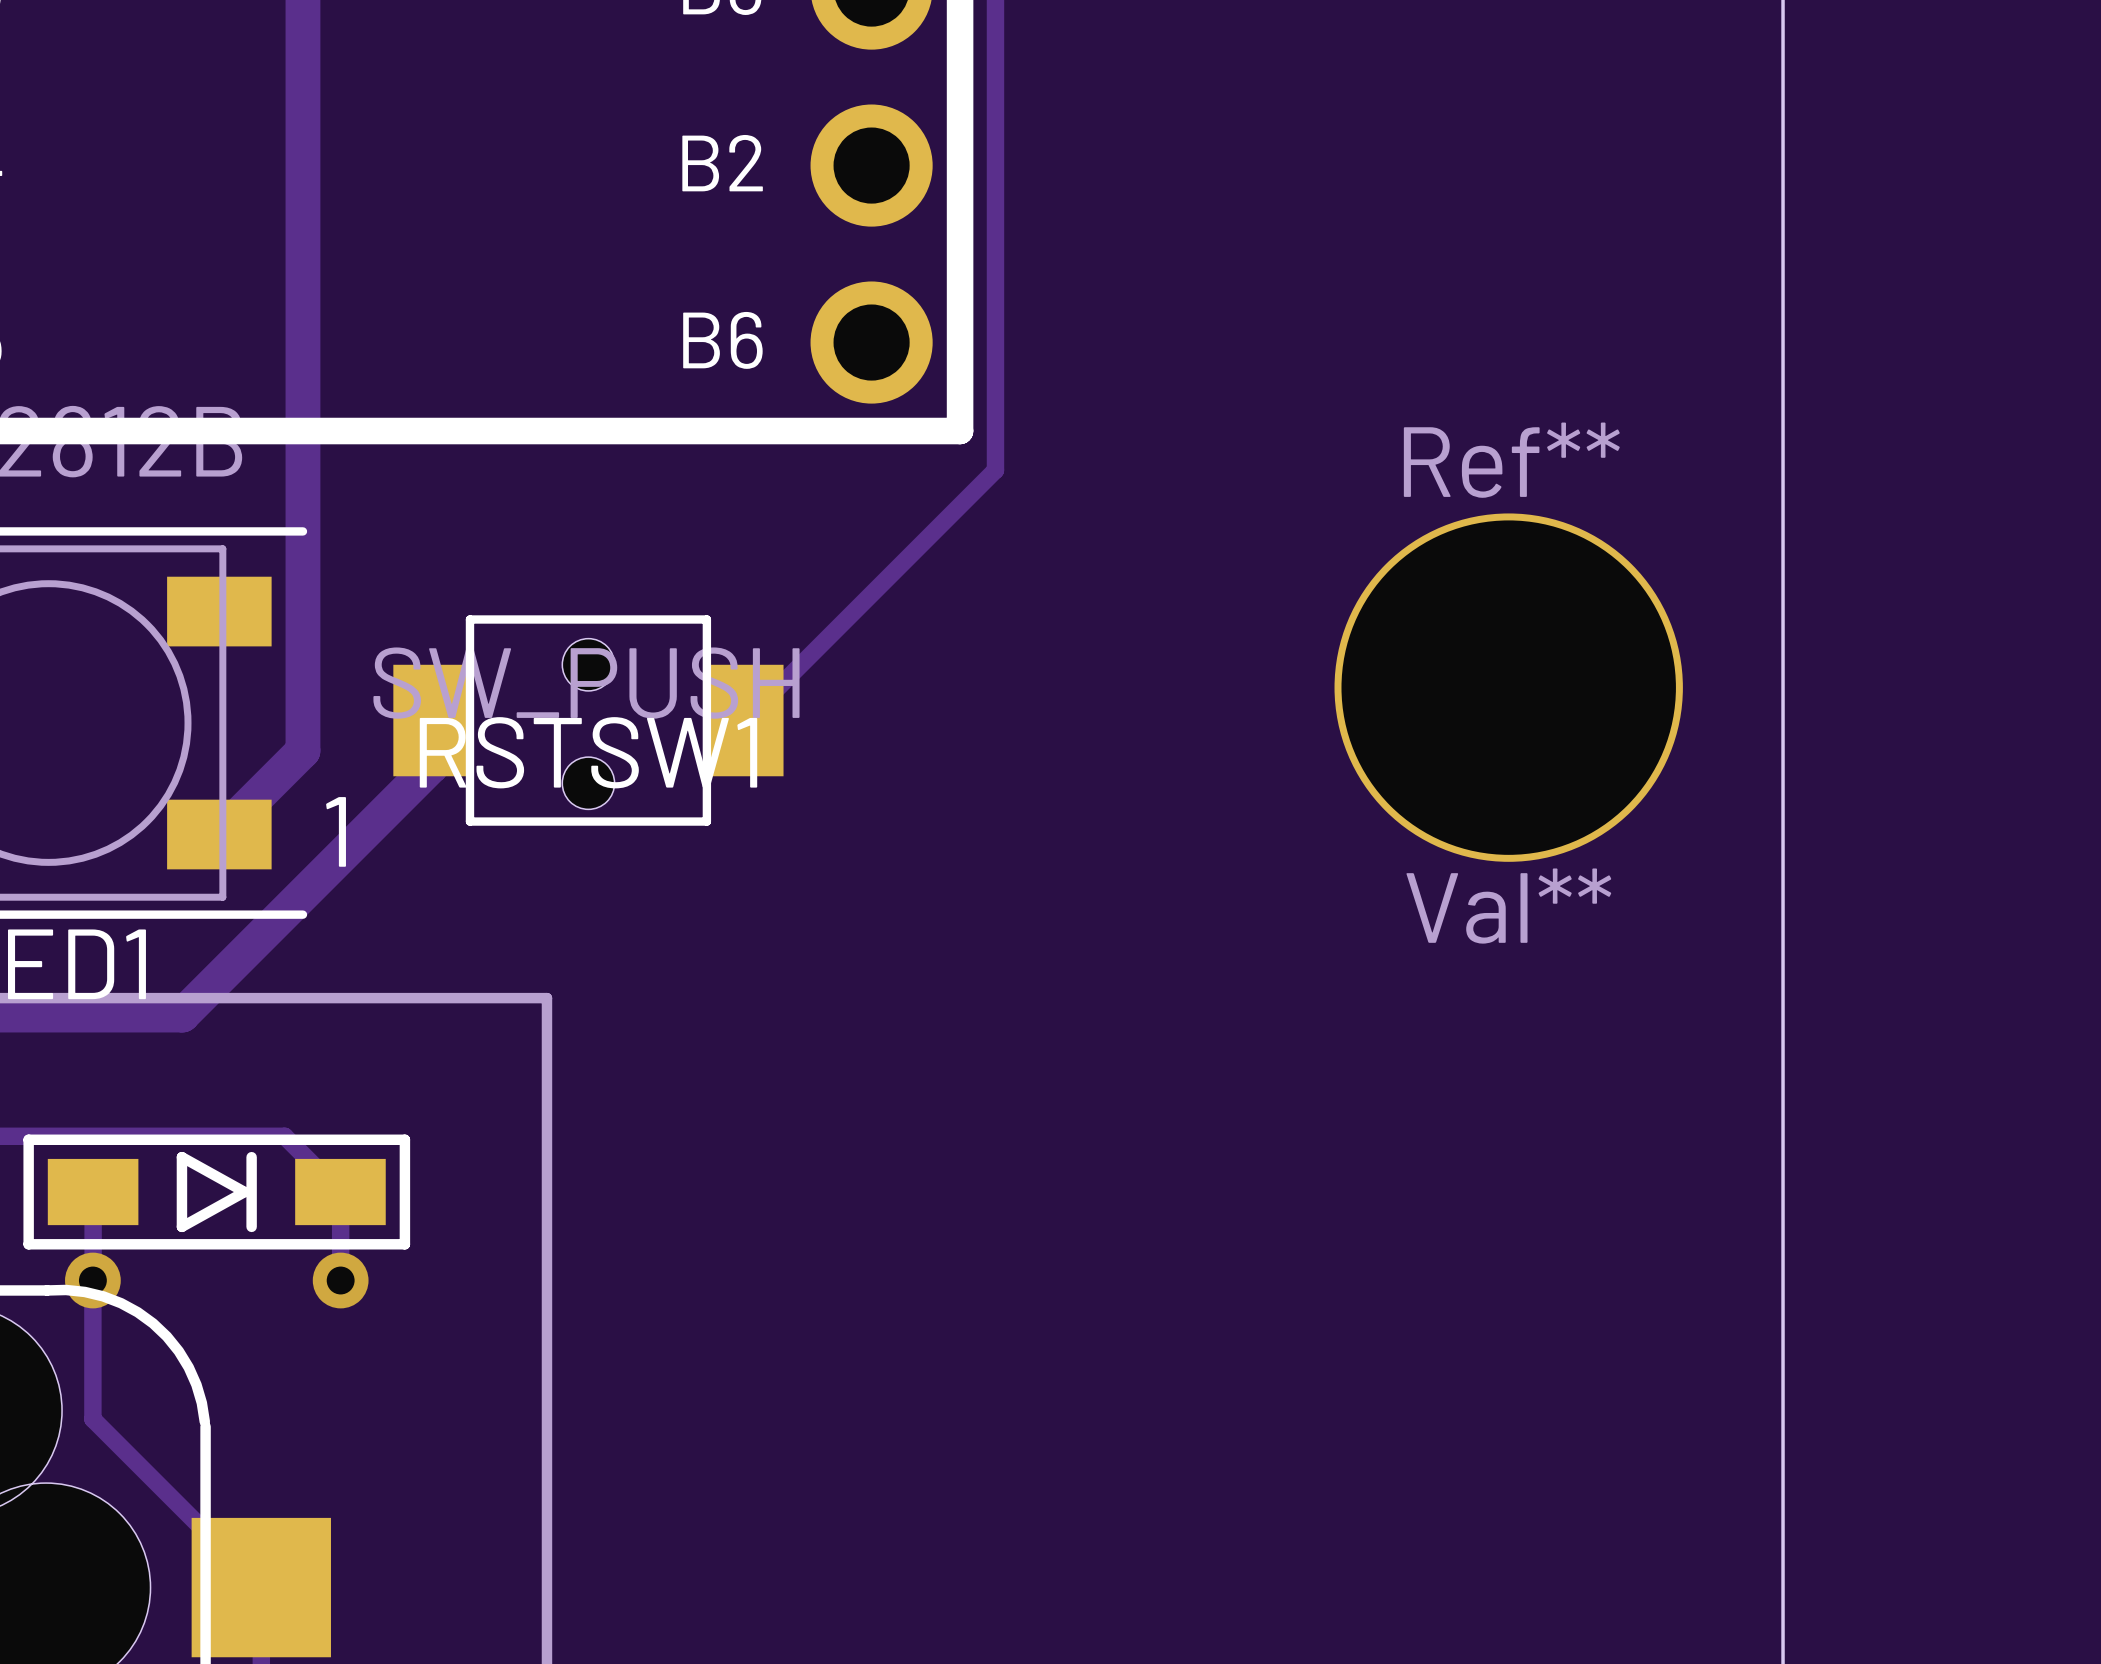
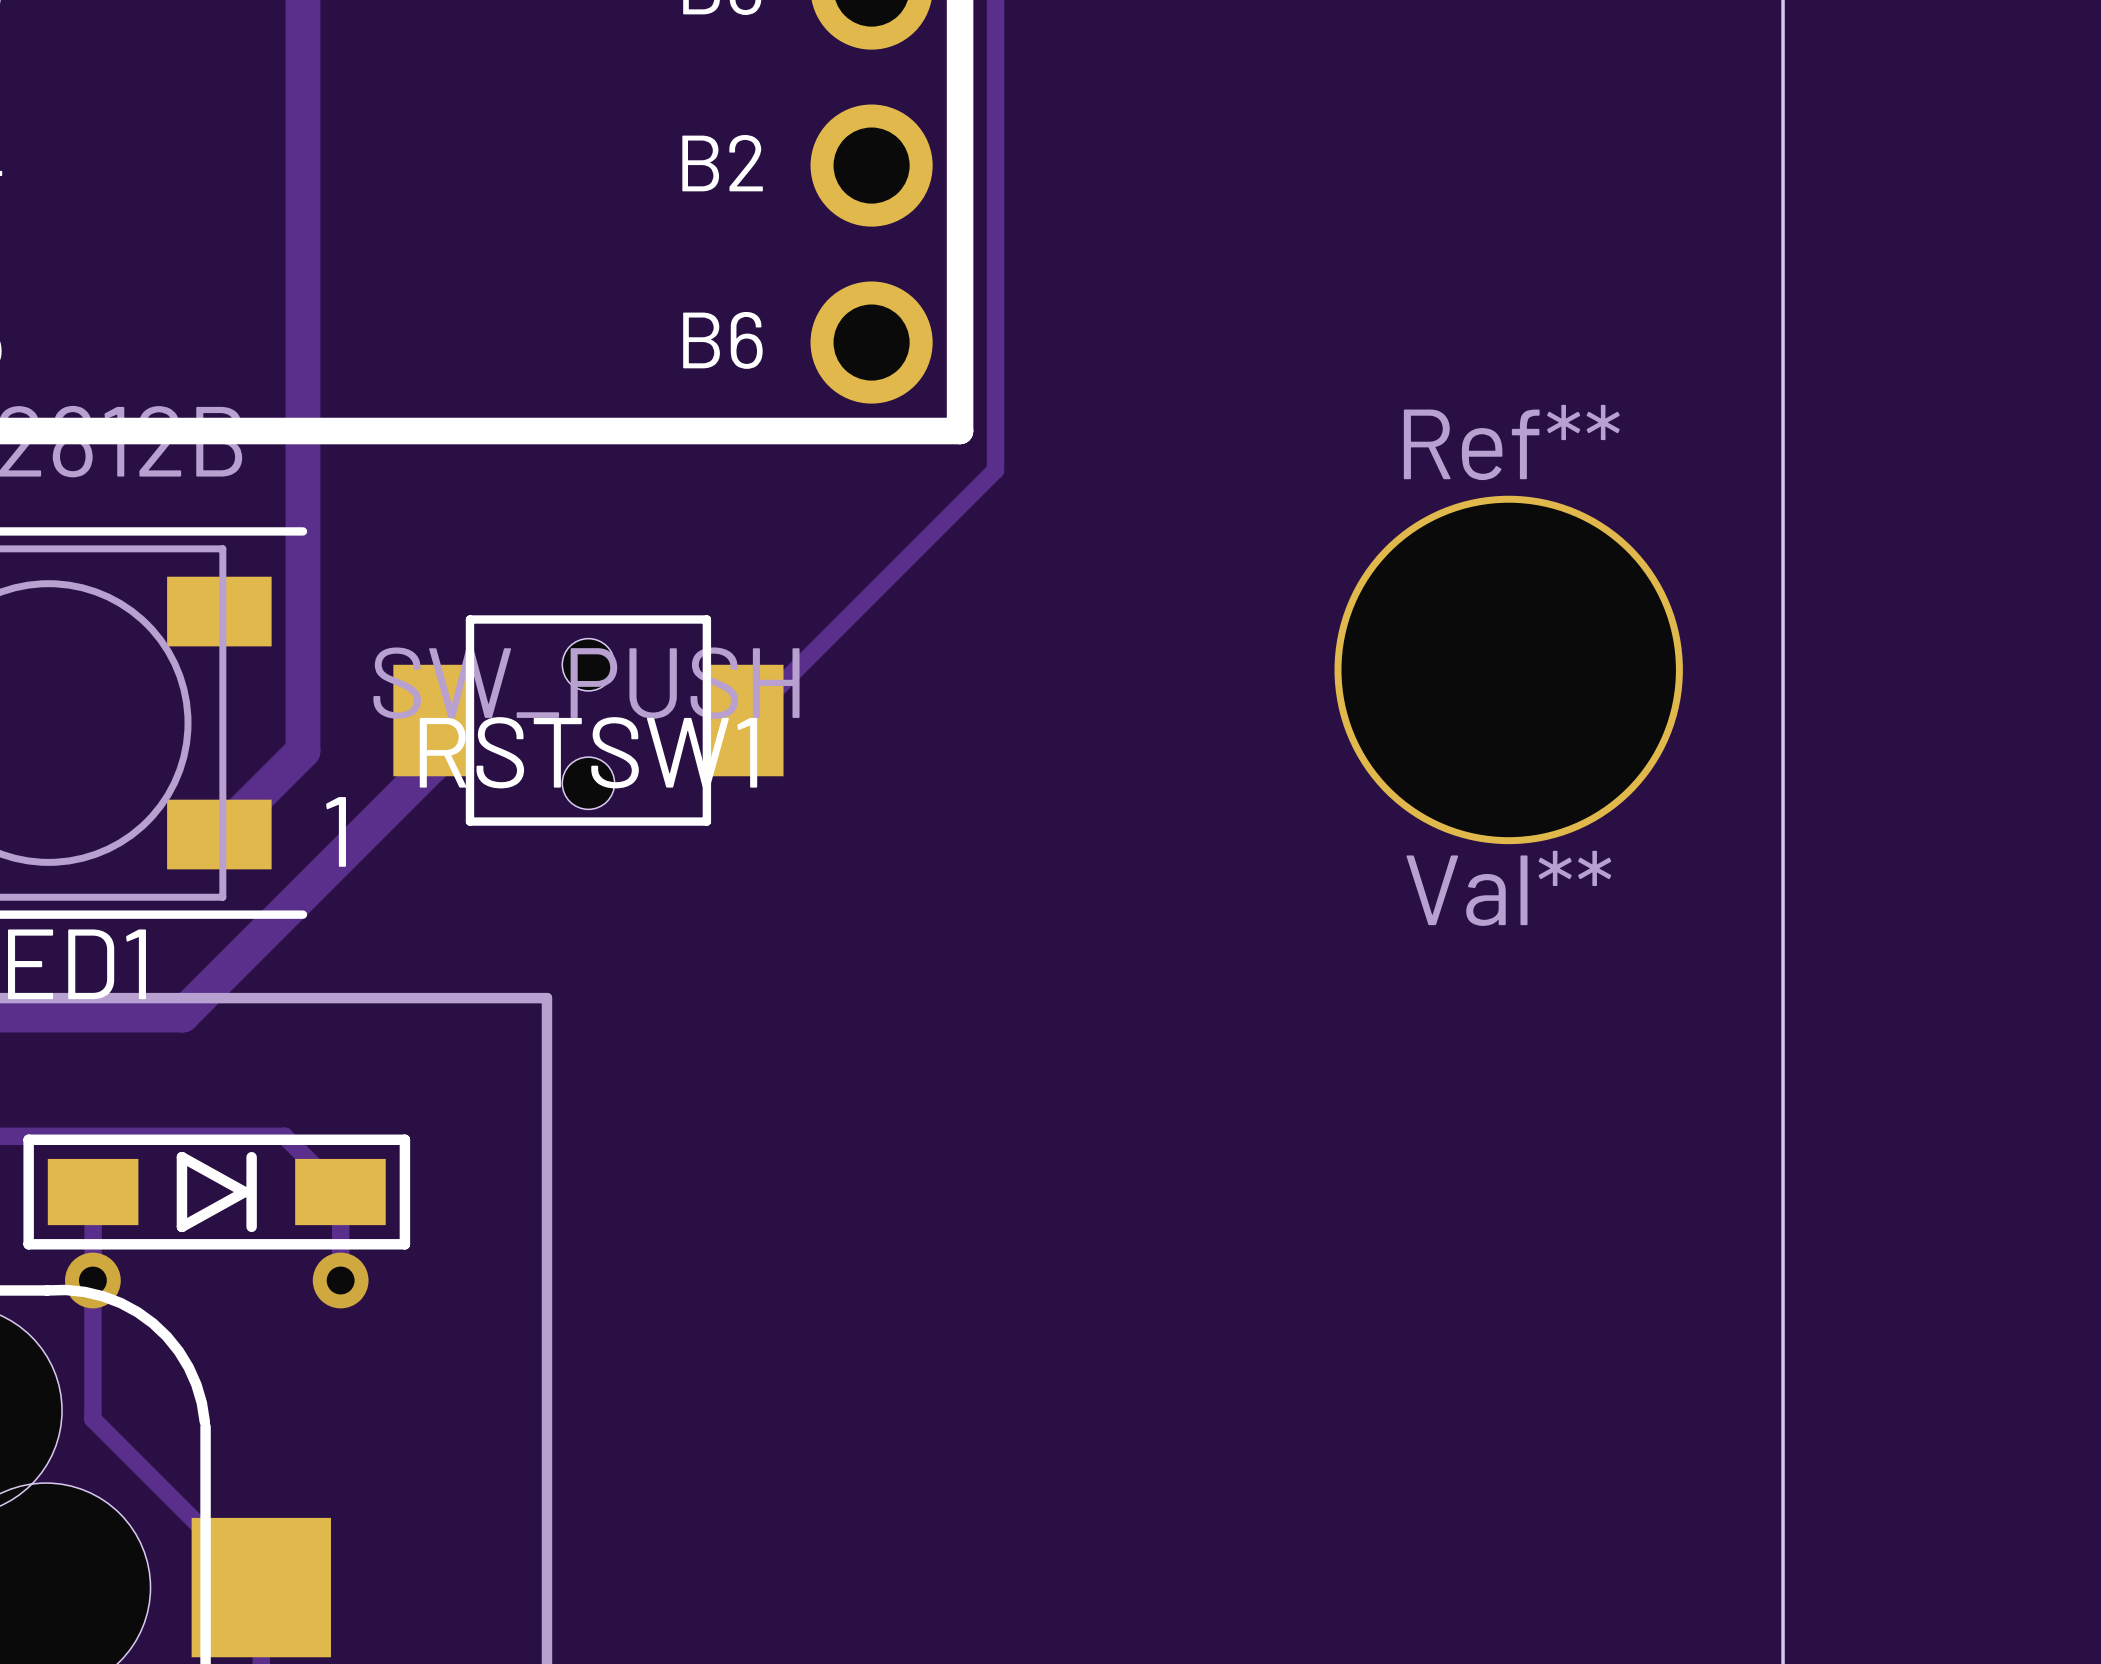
Ref** position: (1508, 687) -> (1508, 669)

